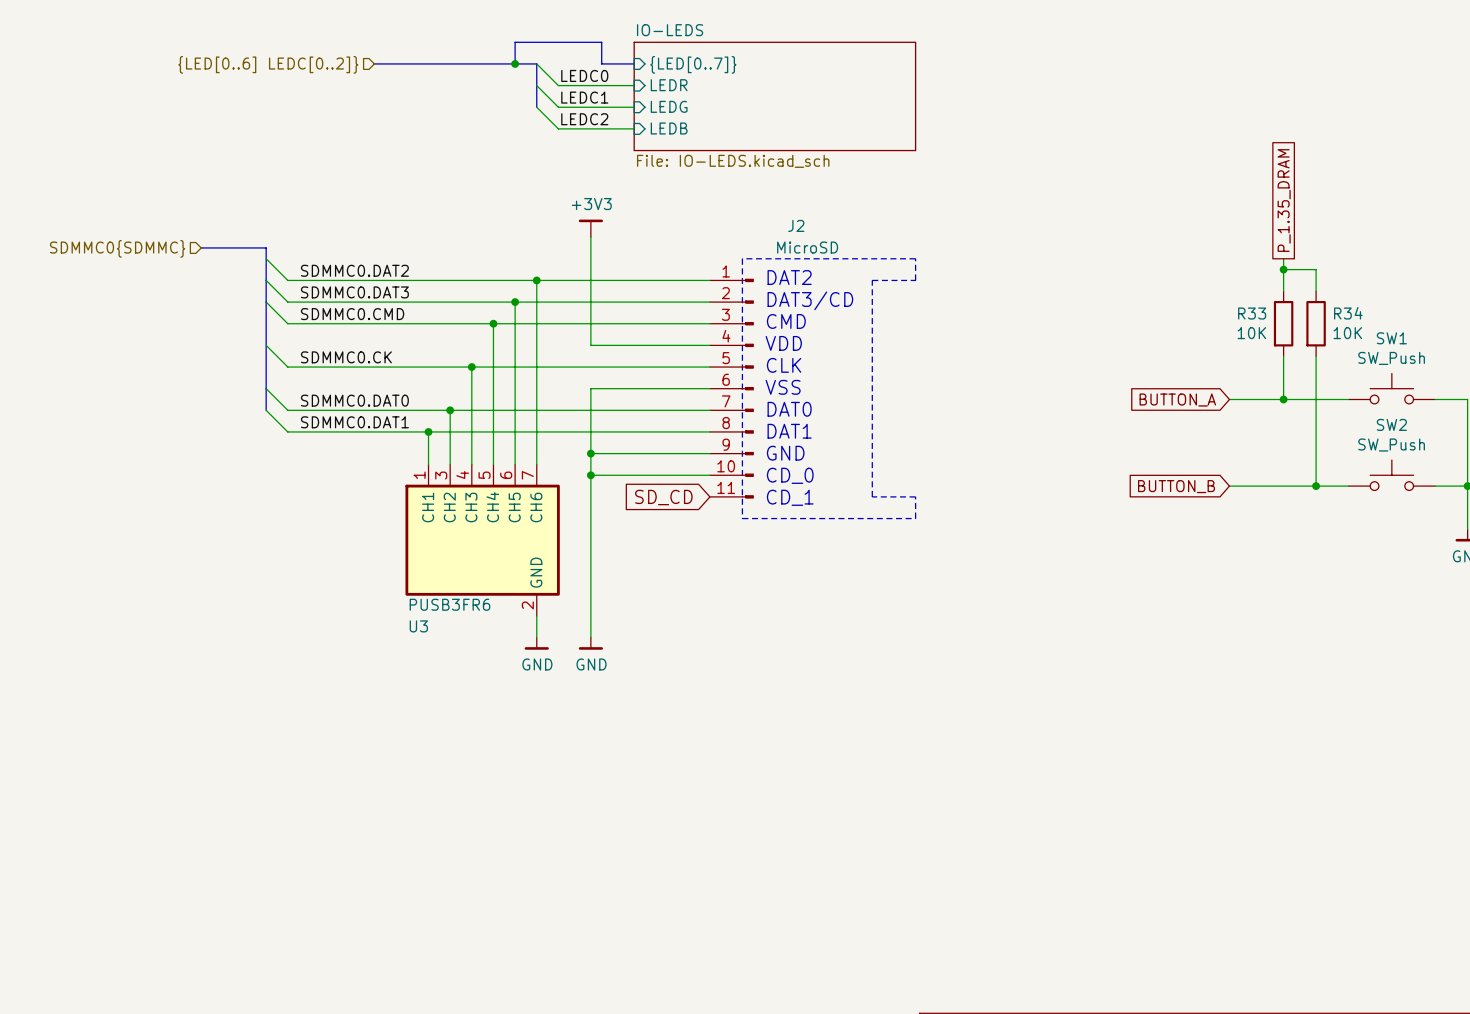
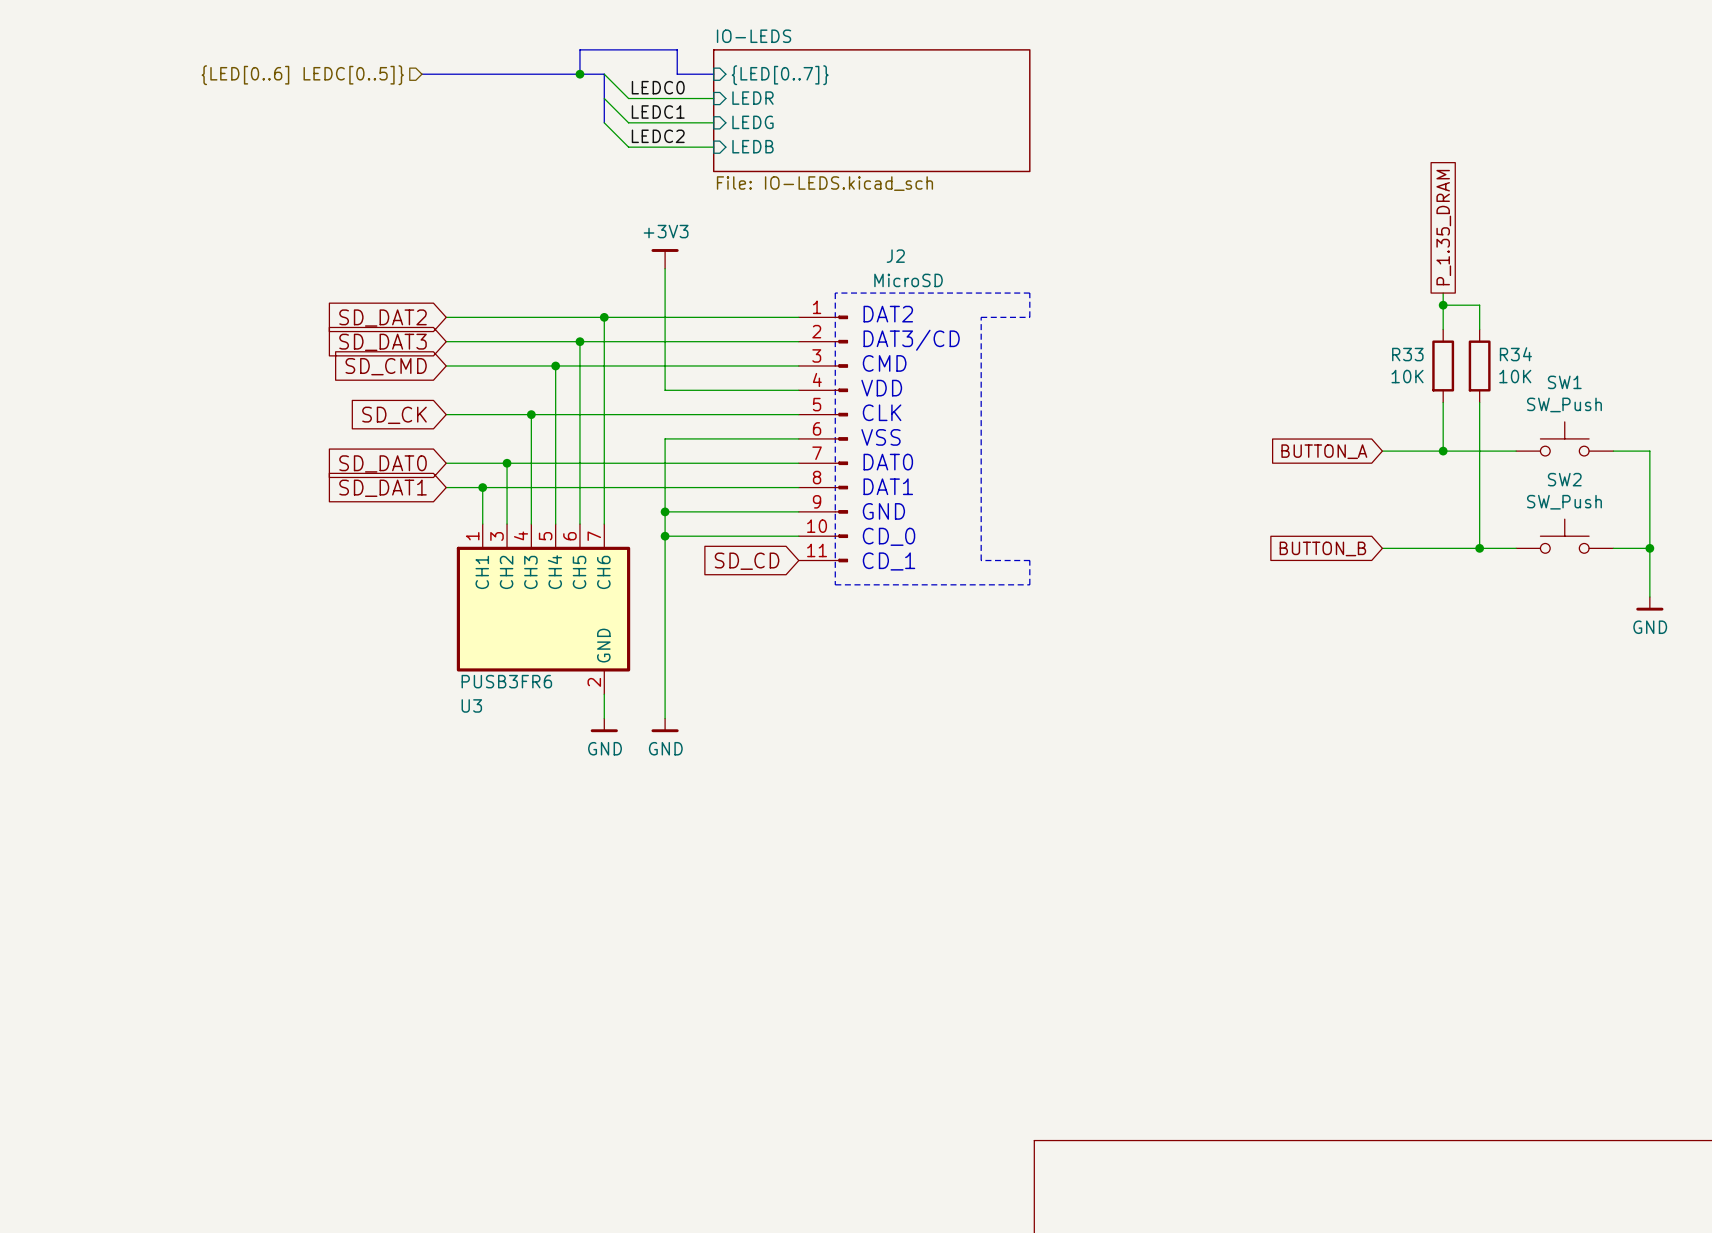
hierarchical label: {LED[0..6] LEDC[0..2]} (268, 64) -> {LED[0..6] LEDC[0..5]} (302, 75)
bus: (201, 247) (266, 247) (266, 410) -> none
hierarchical label: SDMMC0{SDMMC} (117, 248) -> none
wire: (266, 258) (287, 280) (396, 280) -> none
label: SDMMC0.DAT2 (354, 270) -> none
wire: (266, 280) (287, 302) (396, 302) -> none
global label: none -> SD_DAT2 (383, 318)
label: SDMMC0.DAT3 (354, 292) -> none
wire: (266, 302) (287, 323) (396, 323) -> none
global label: none -> SD_DAT3 (383, 342)
label: SDMMC0.CMD (352, 314) -> none
global label: none -> SD_CMD (386, 366)
wire: (266, 345) (287, 367) (396, 367) -> none
label: SDMMC0.CK (346, 357) -> none
global label: none -> SD_CK (394, 415)
wire: (266, 388) (287, 410) (396, 410) -> none
label: SDMMC0.DAT0 (354, 400) -> none
wire: (266, 410) (287, 431) (396, 431) -> none
global label: none -> SD_DAT0 (383, 463)
label: SDMMC0.DAT1 (354, 422) -> none
global label: none -> SD_DAT1 (383, 488)

